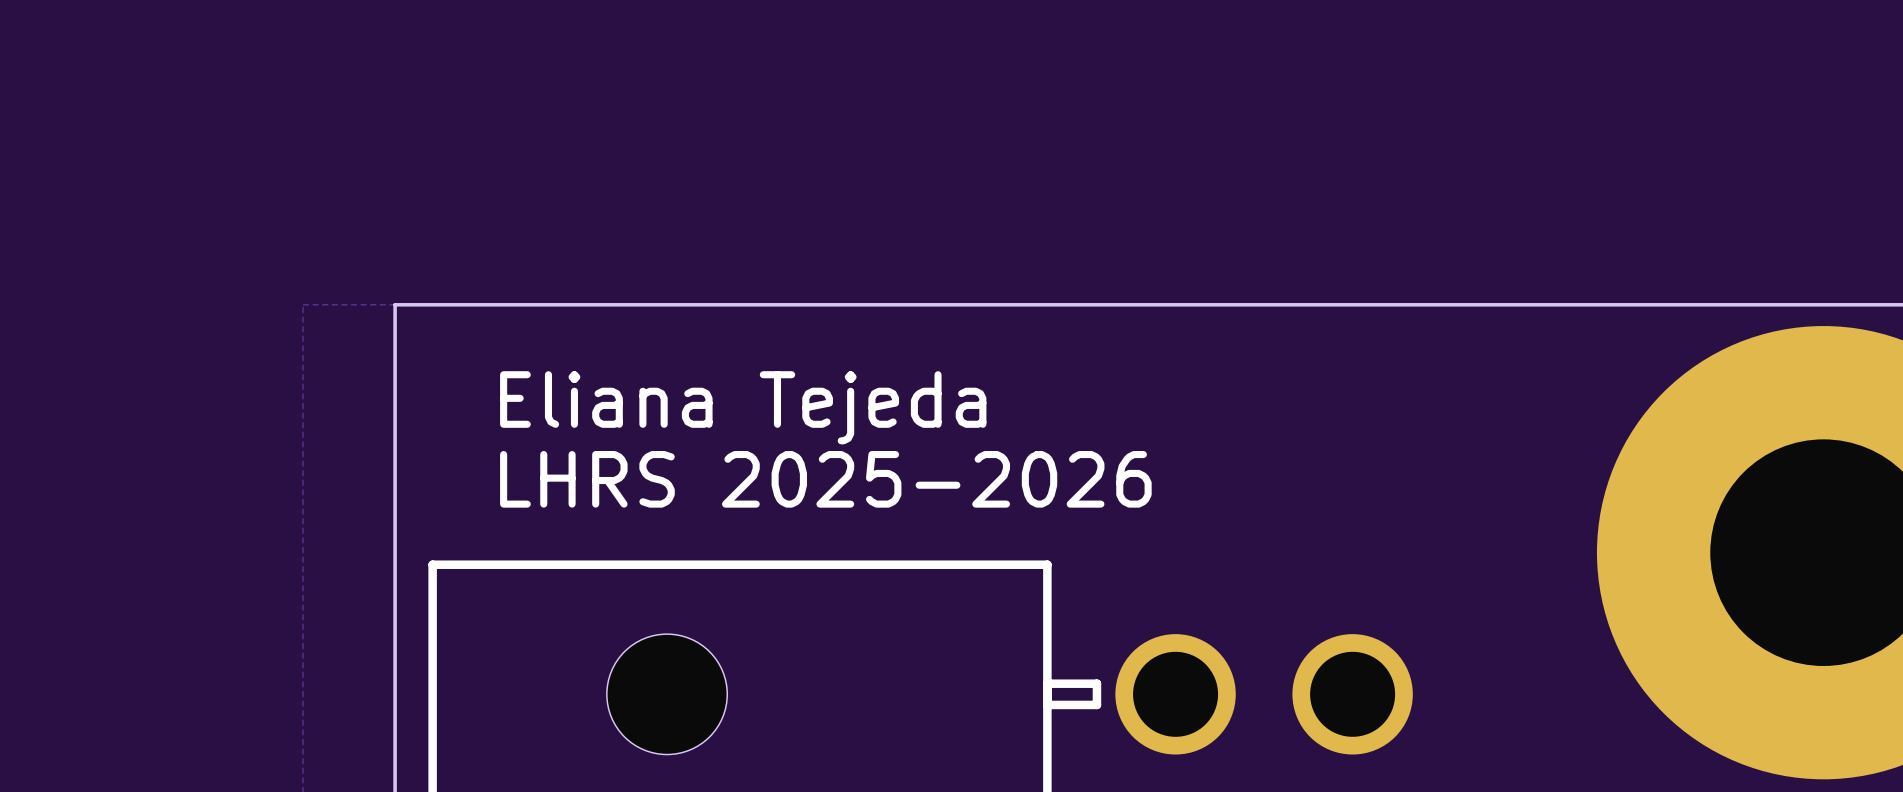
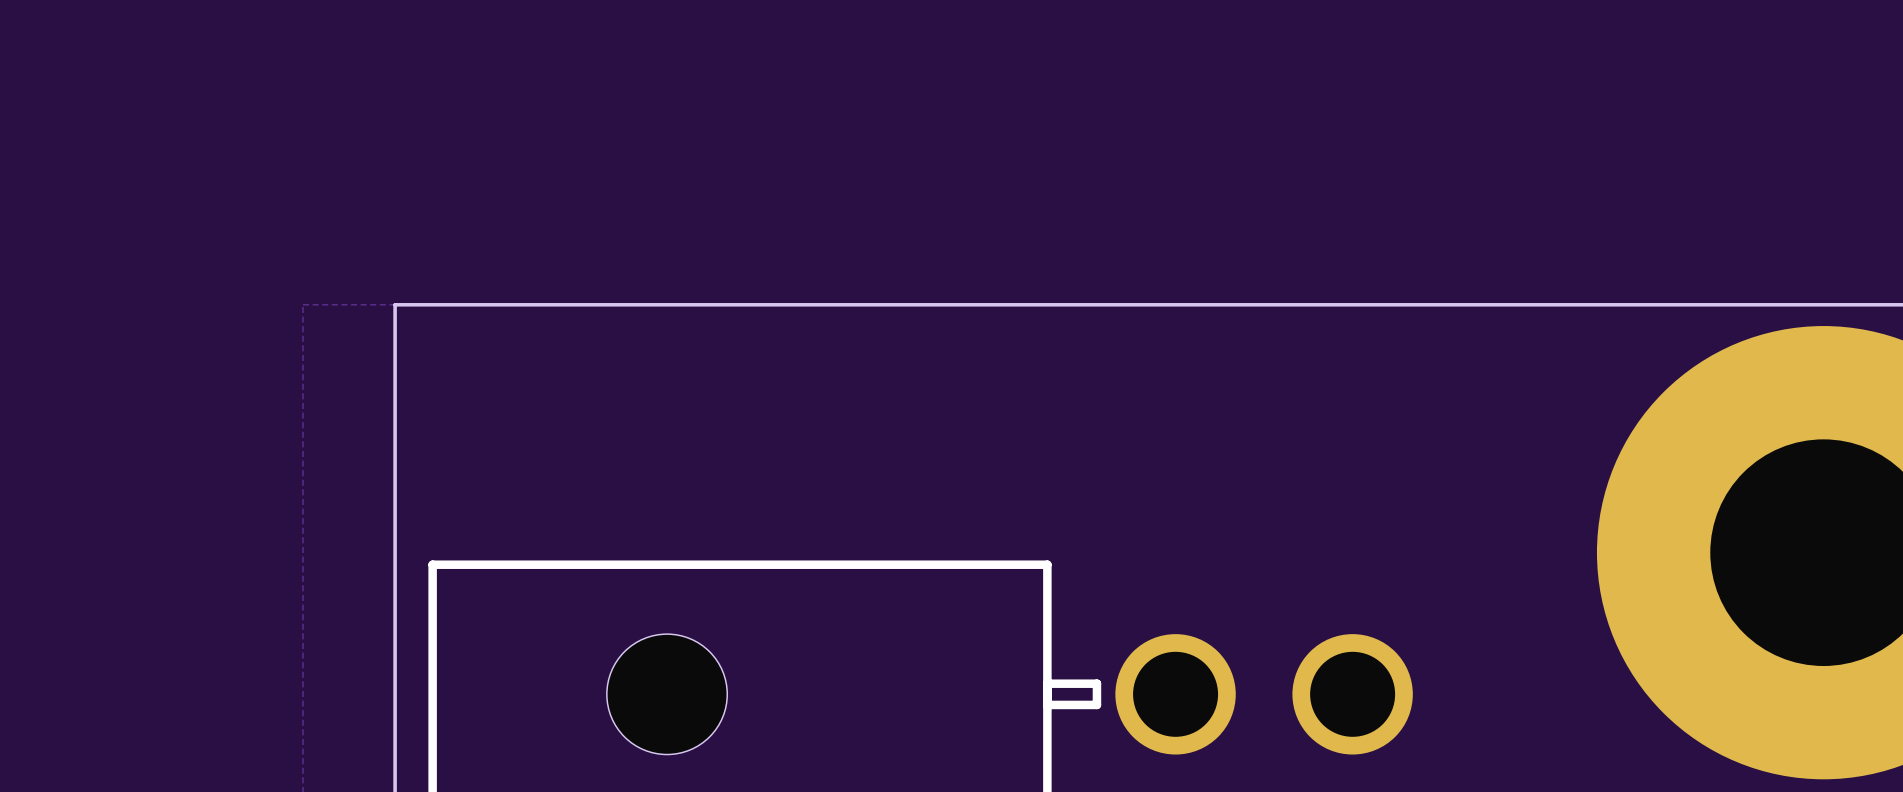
text: Eliana Tejeda (743, 407) -> none
text: LHRS 2025-2026 (825, 479) -> none

